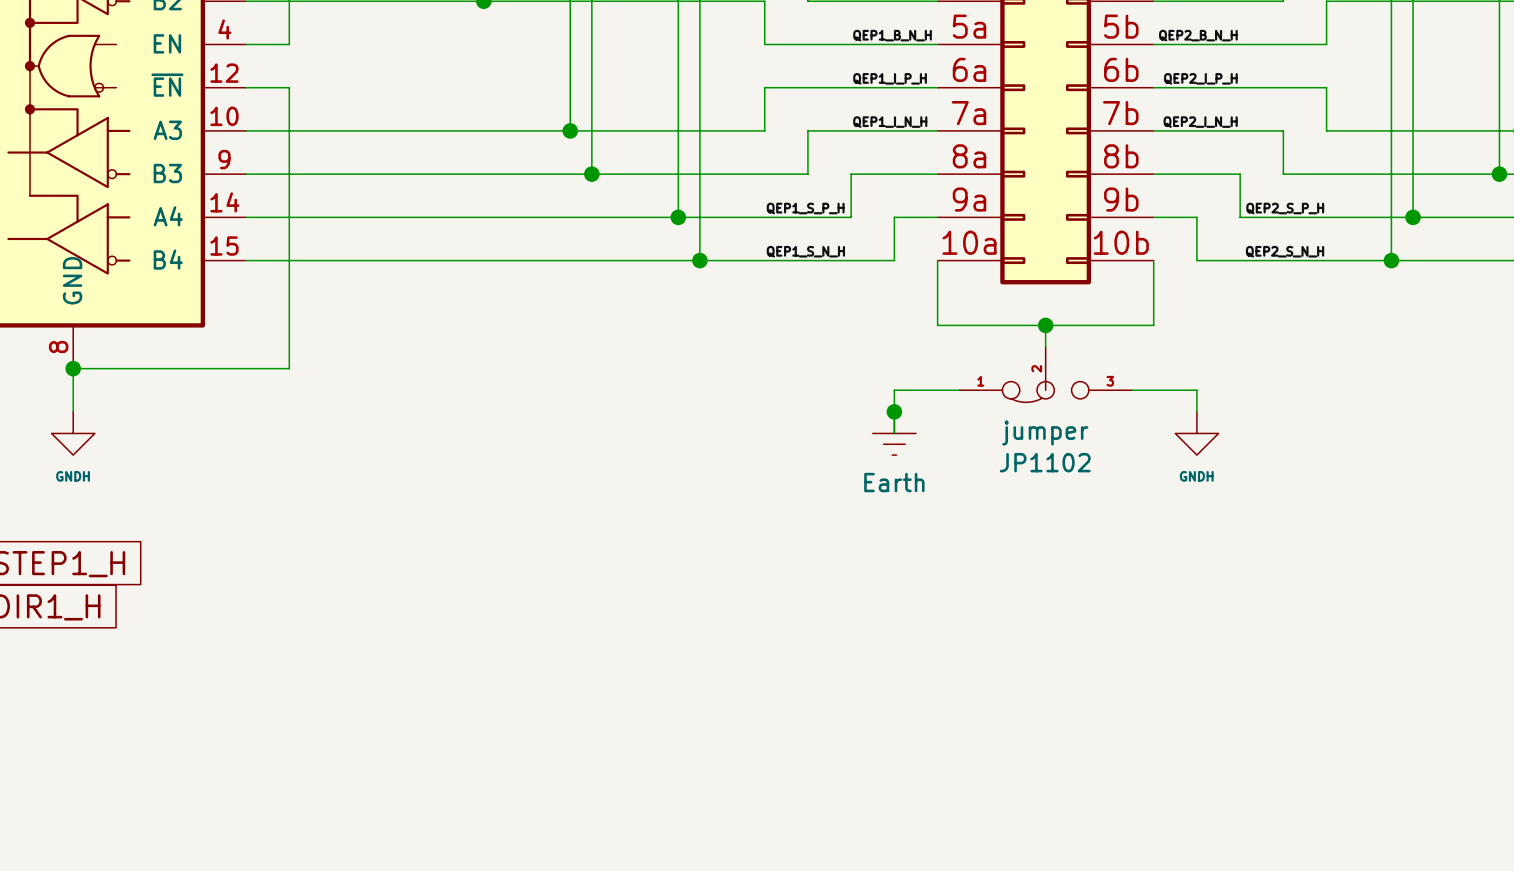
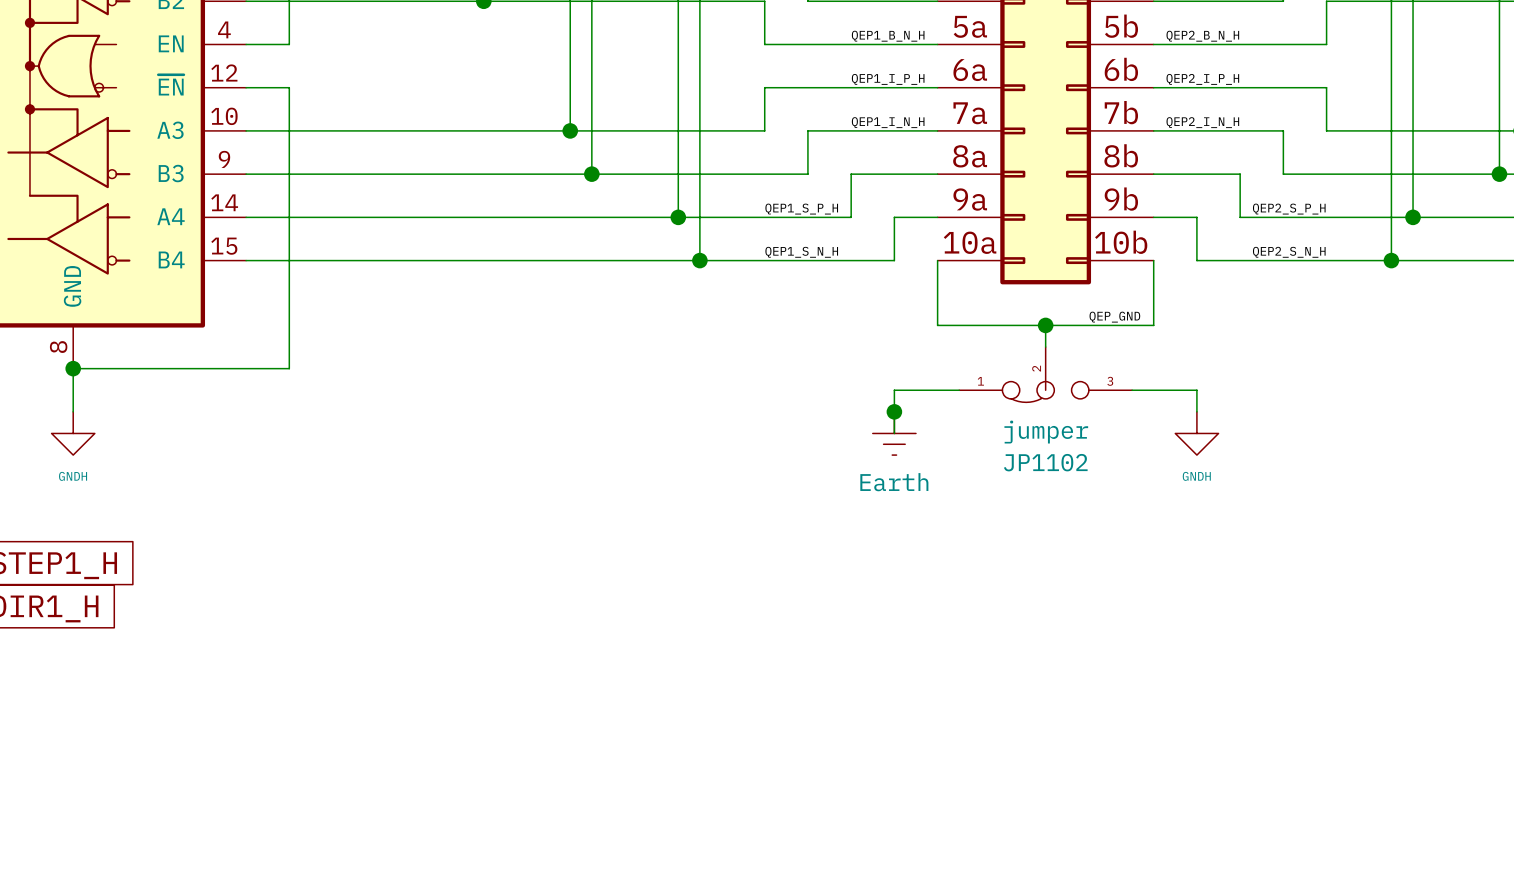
label: none -> QEP_GND (1114, 317)

